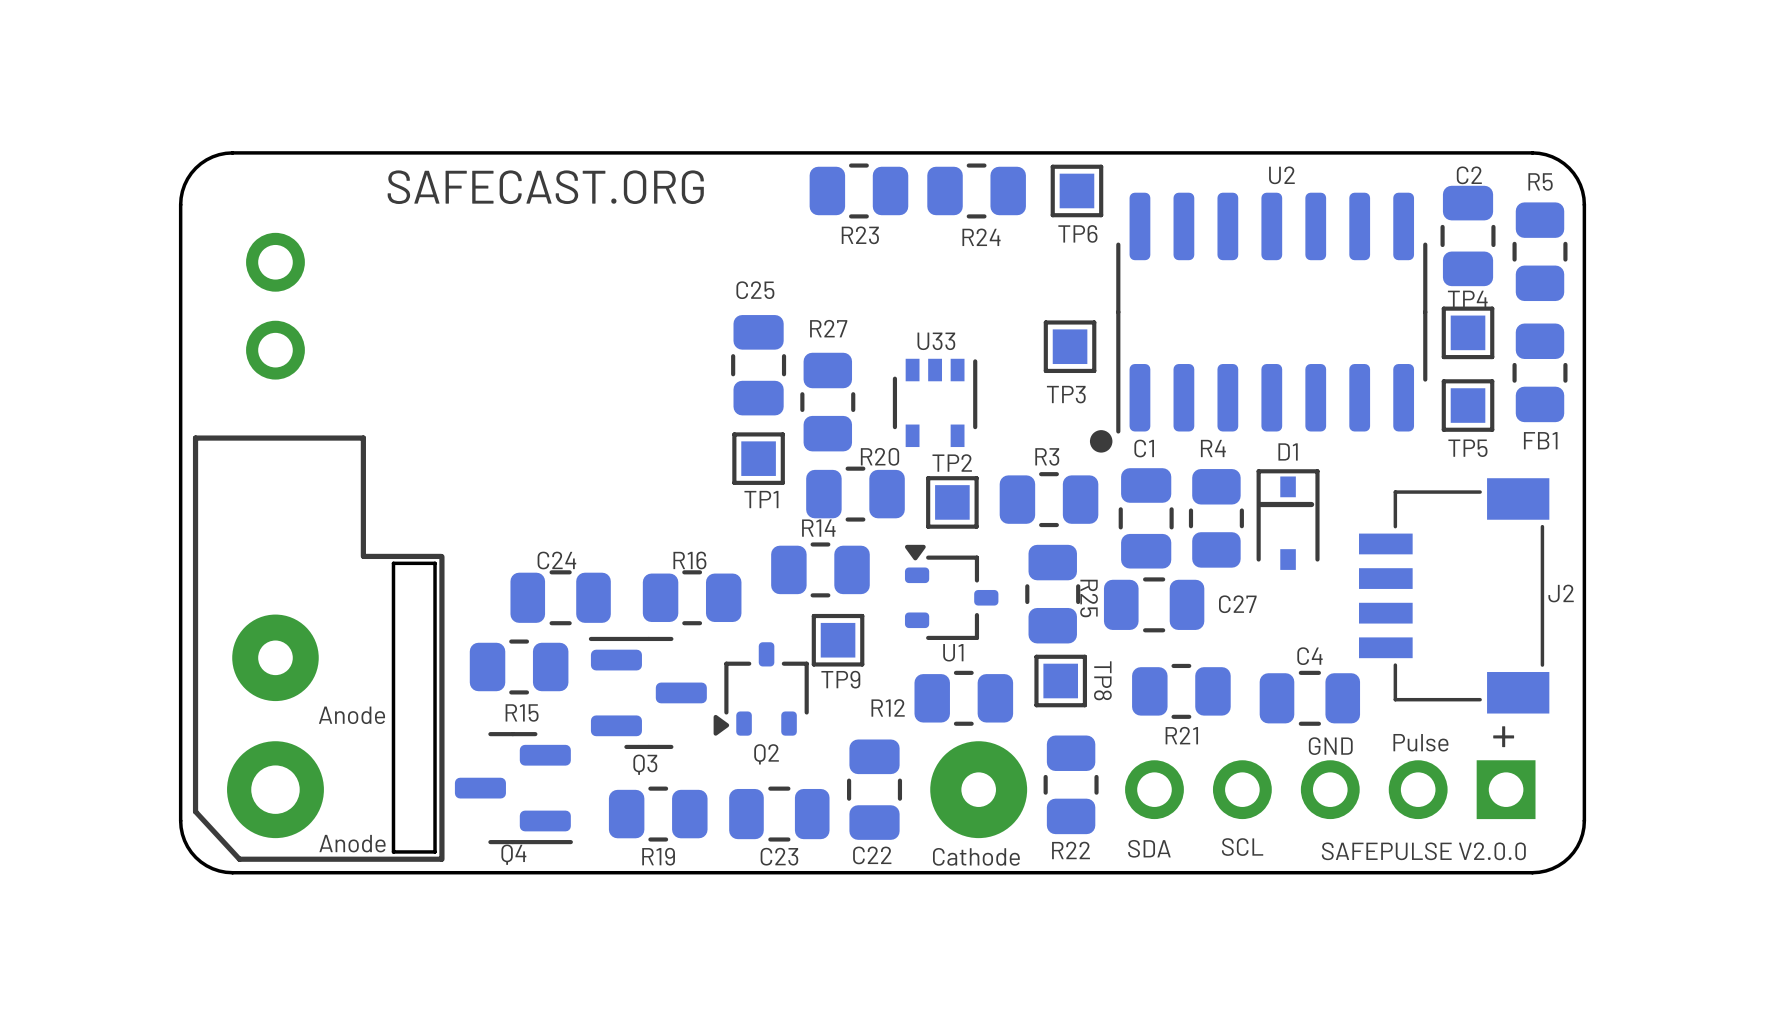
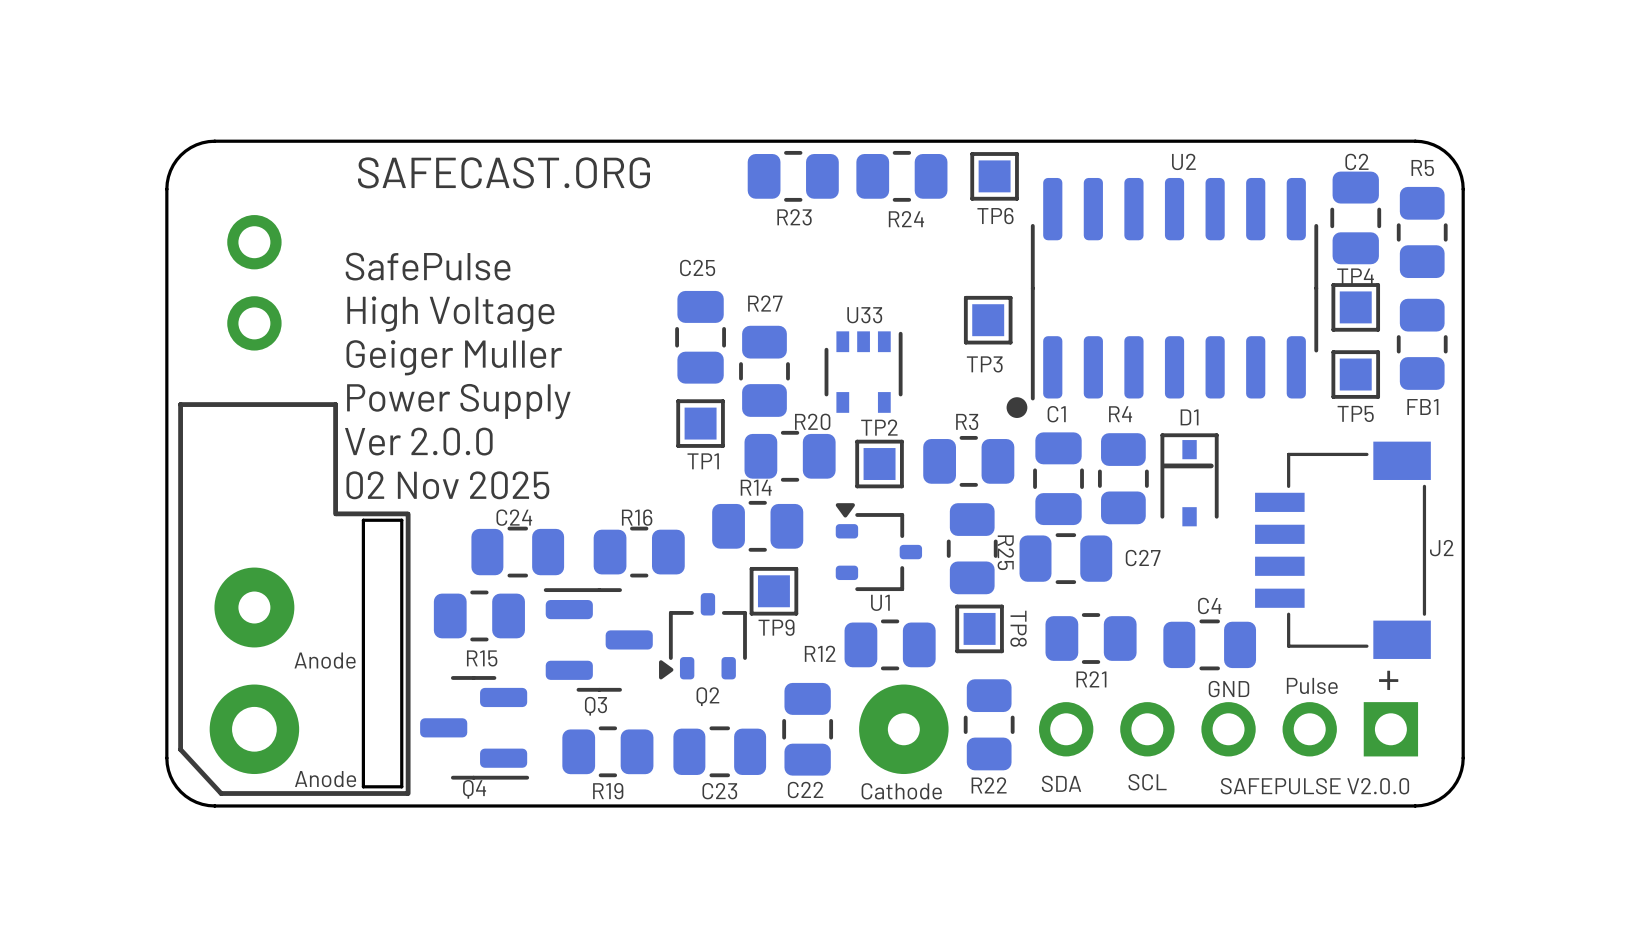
text: none -> SafePulse (428, 266)
text: none -> High Voltage (450, 314)
text: none -> Geiger Muller (454, 357)
text: none -> Power Supply (458, 401)
text: none -> Ver 2.0.0 (418, 441)
text: none -> 02 Nov 2025 (447, 485)

